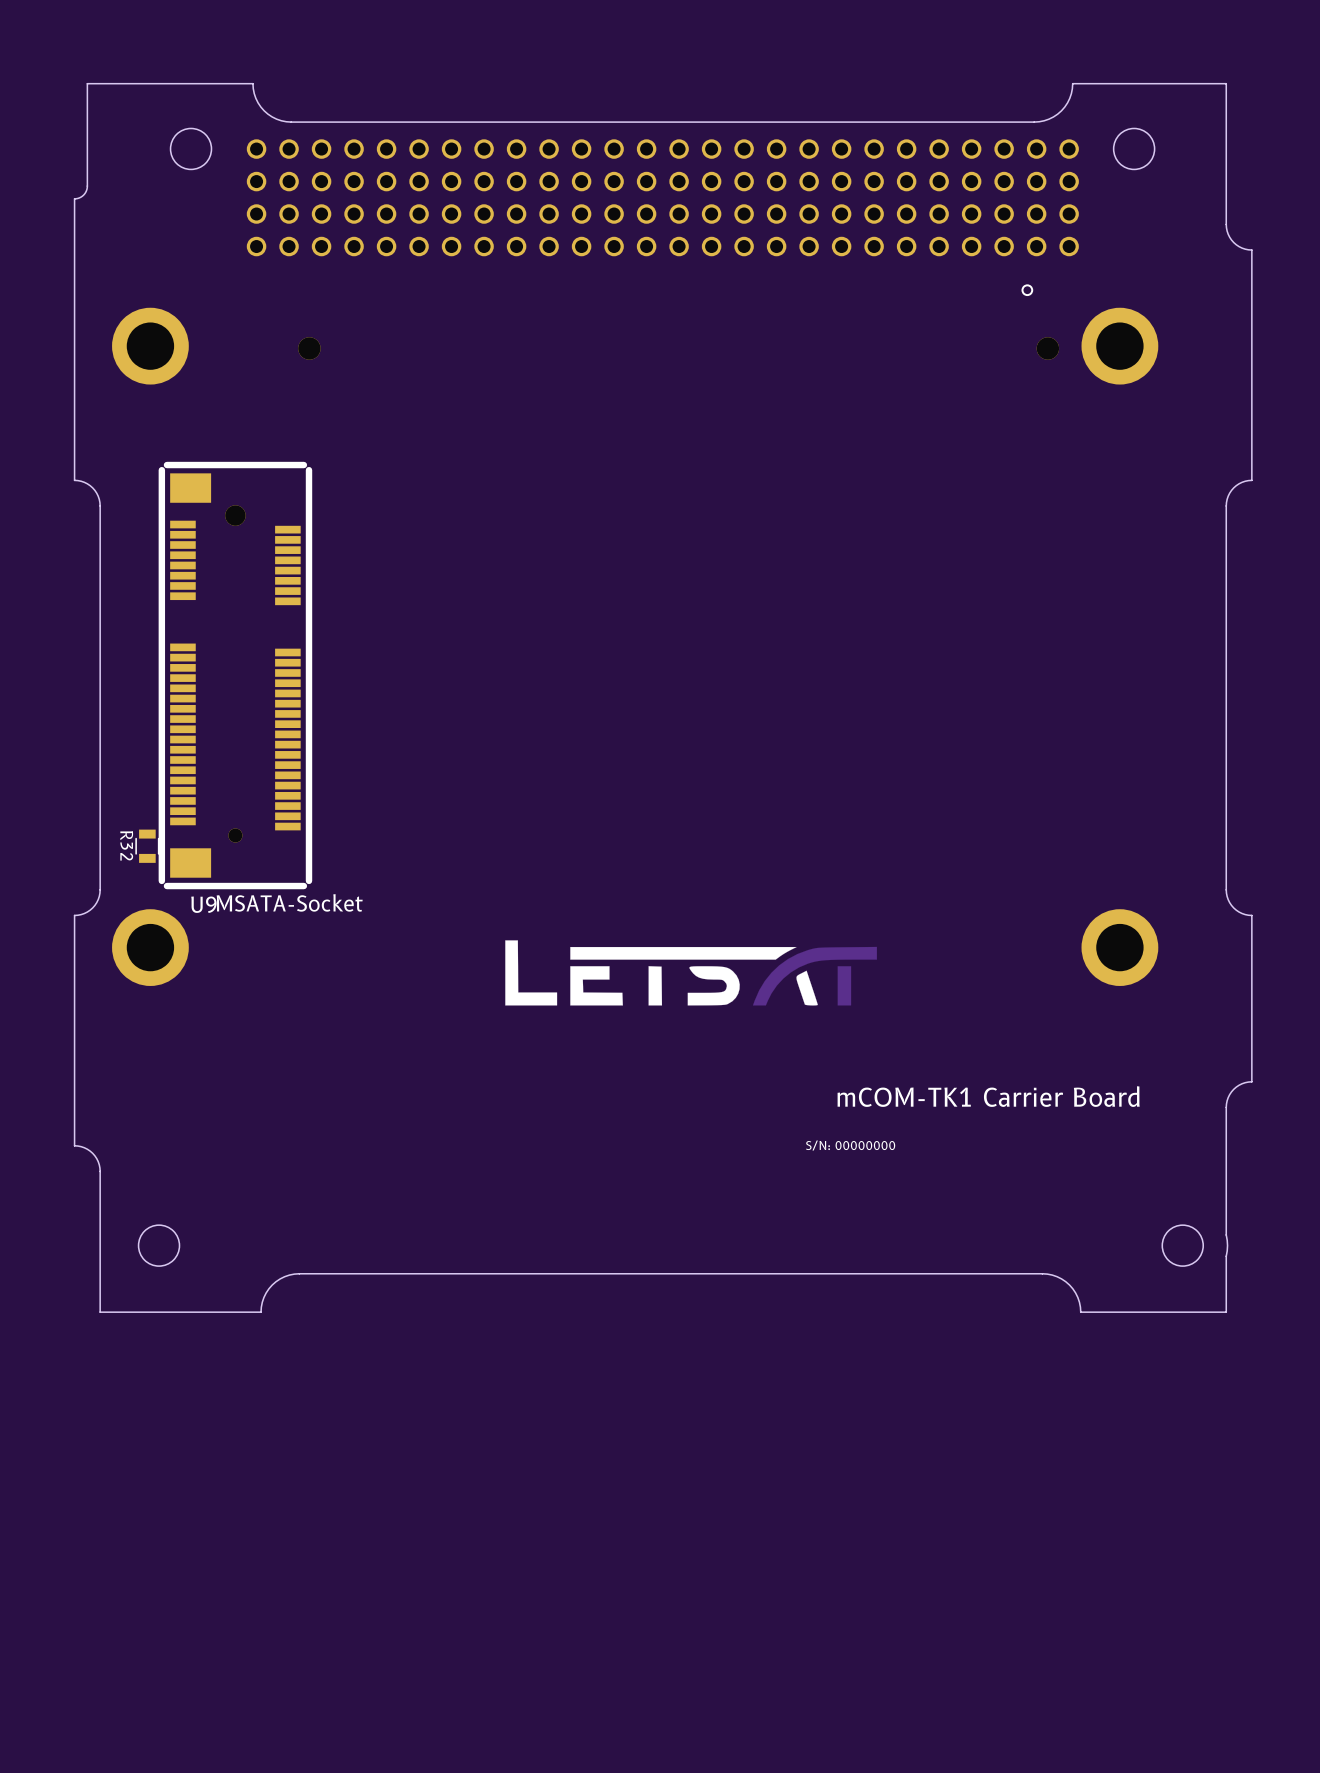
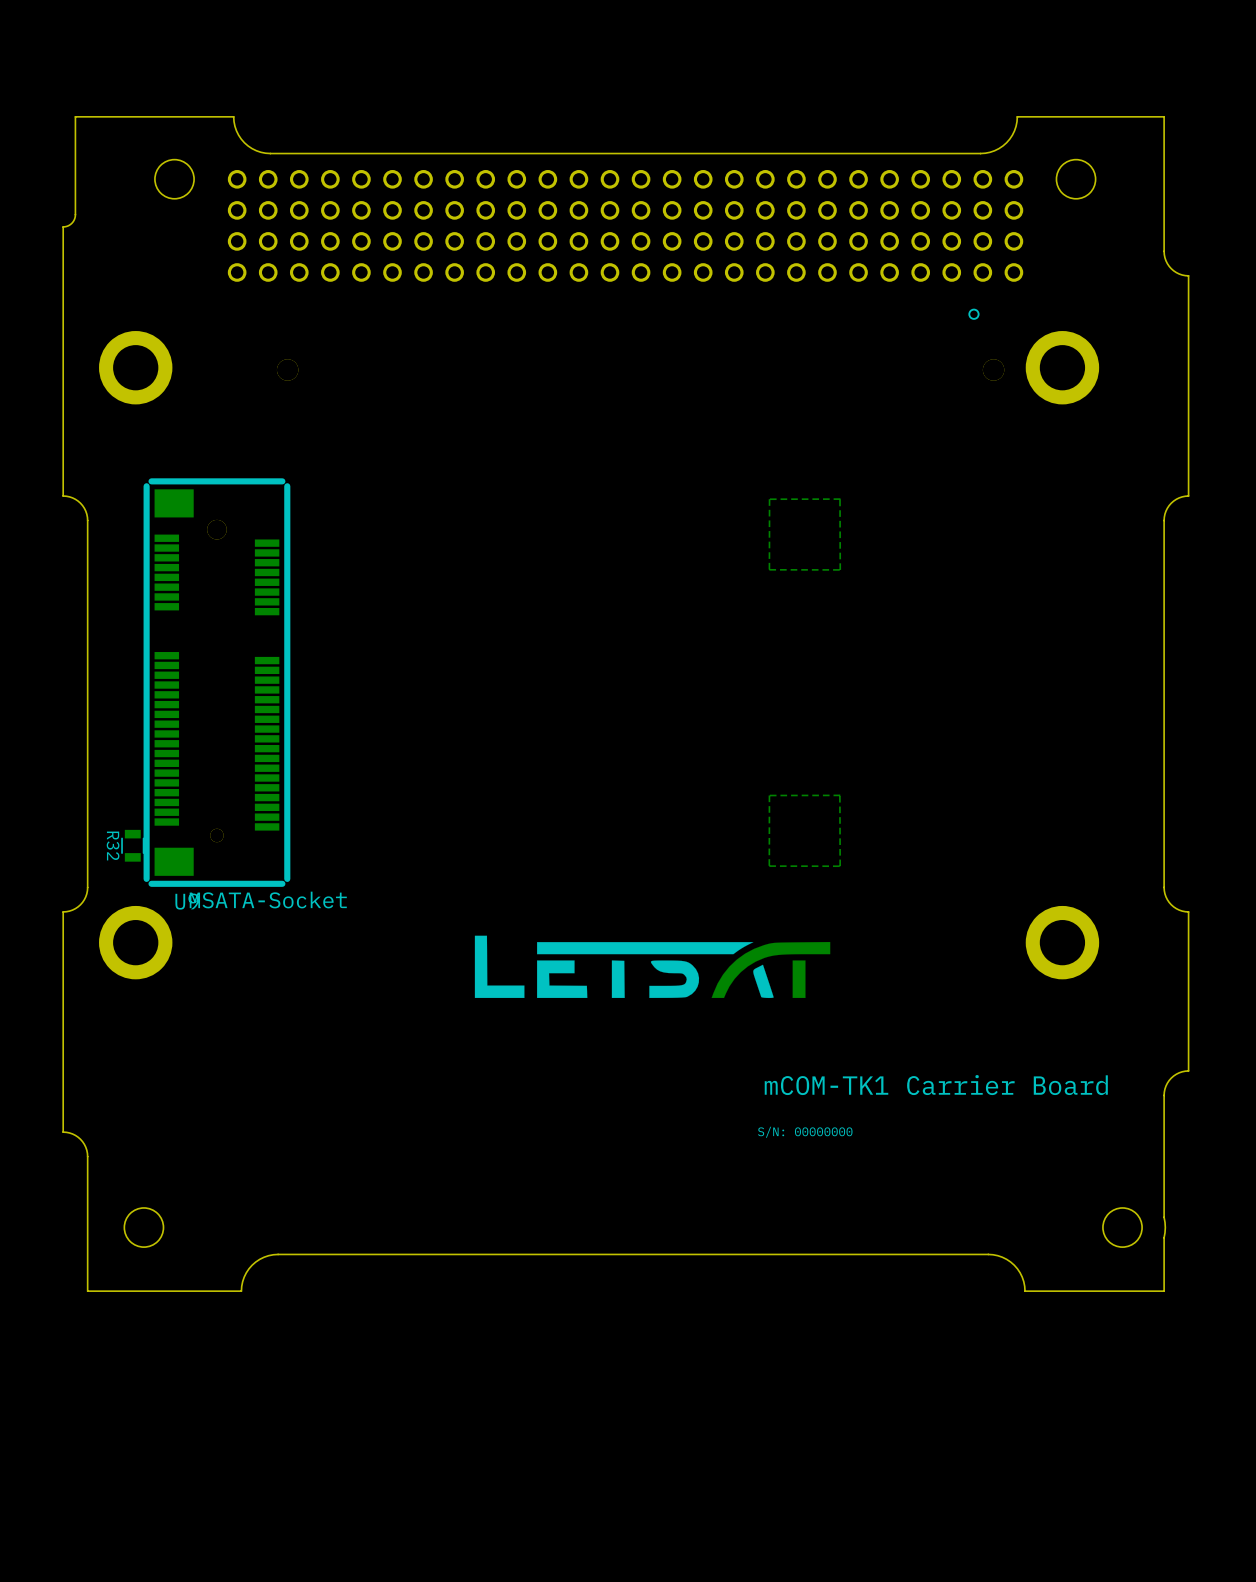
zone outline: none -> (840, 499) (769, 499) (769, 569) (840, 569) (840, 499)
zone outline: none -> (840, 795) (769, 795) (769, 866) (840, 866) (839, 795)

